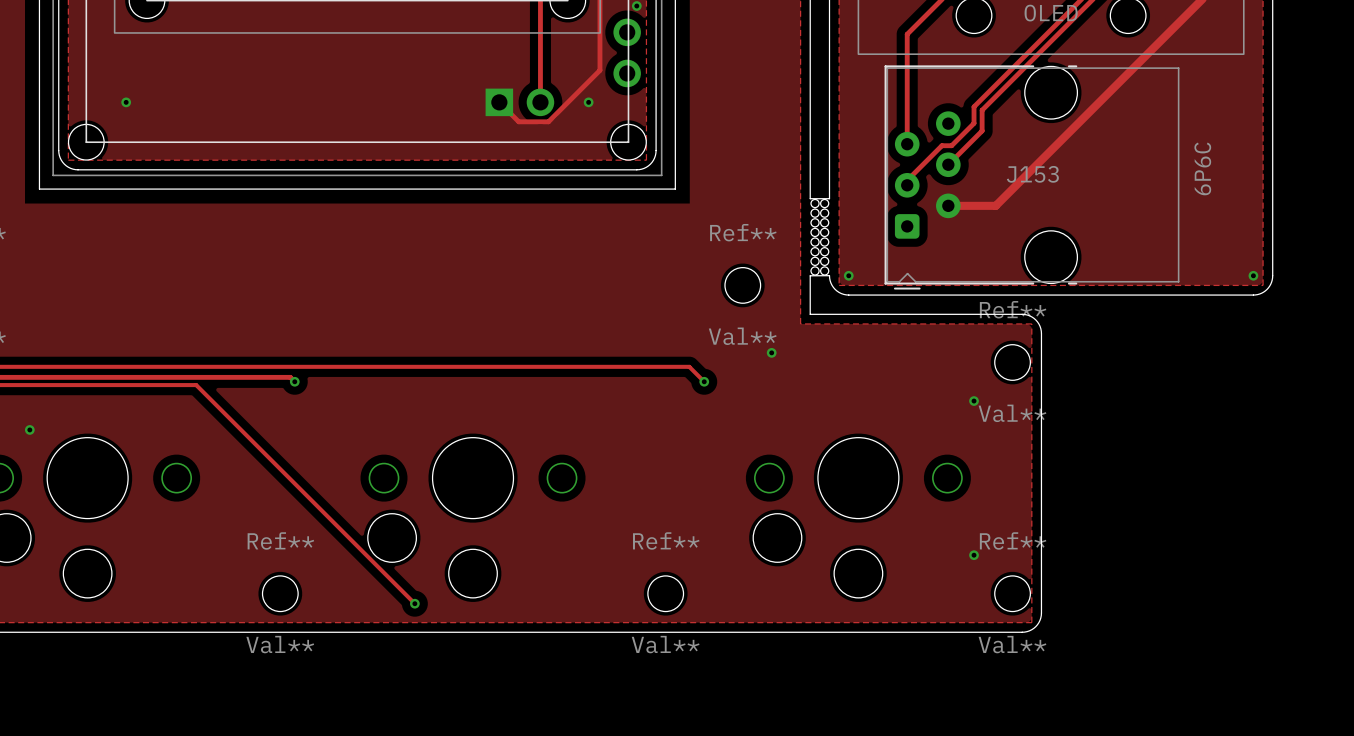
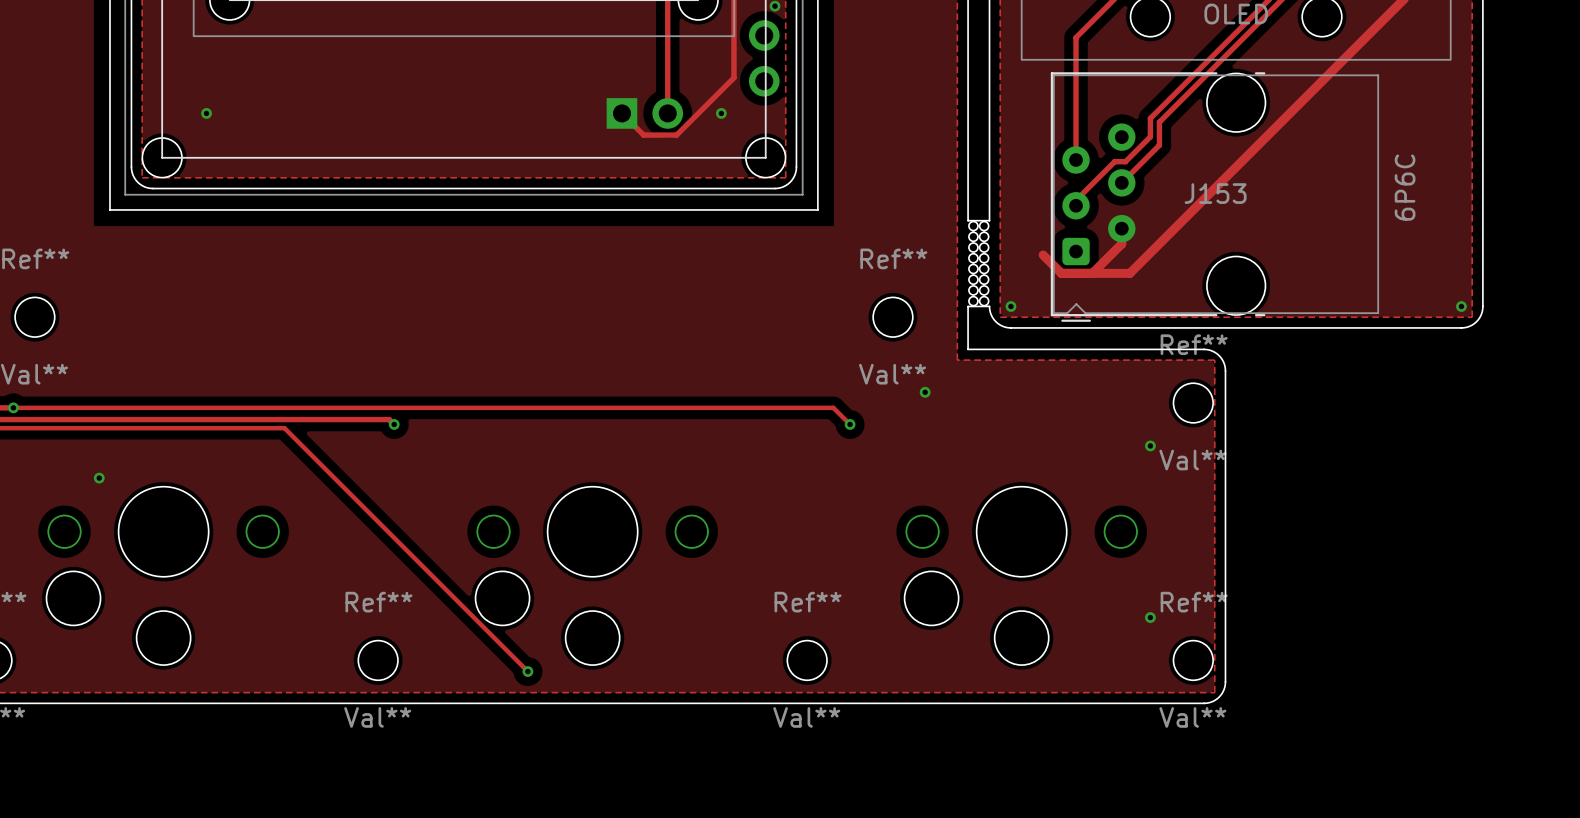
track: (948, 205) (995, 205) -> (1043, 255) (1061, 273) (1129, 273) (1174, 228)
track: none -> (1121, 228) (1121, 243) (1092, 273)

